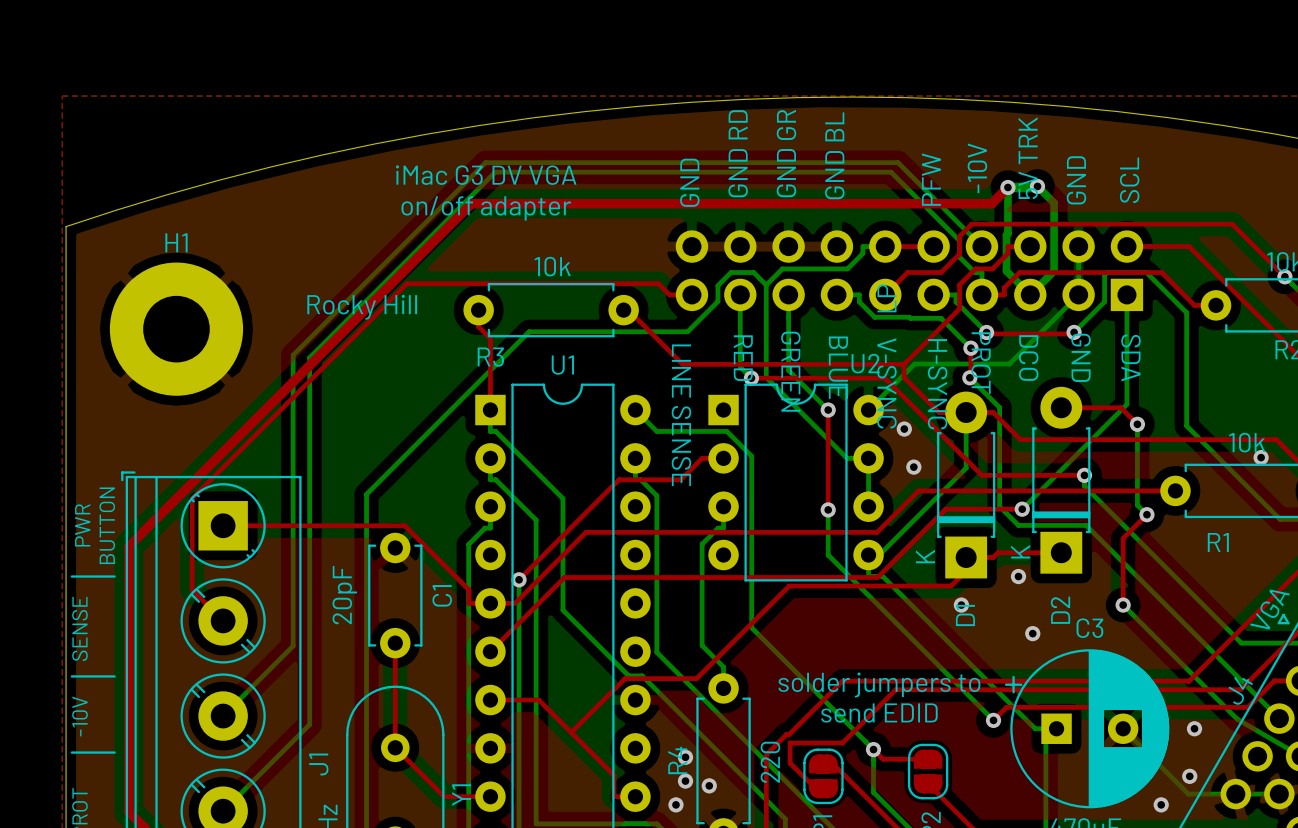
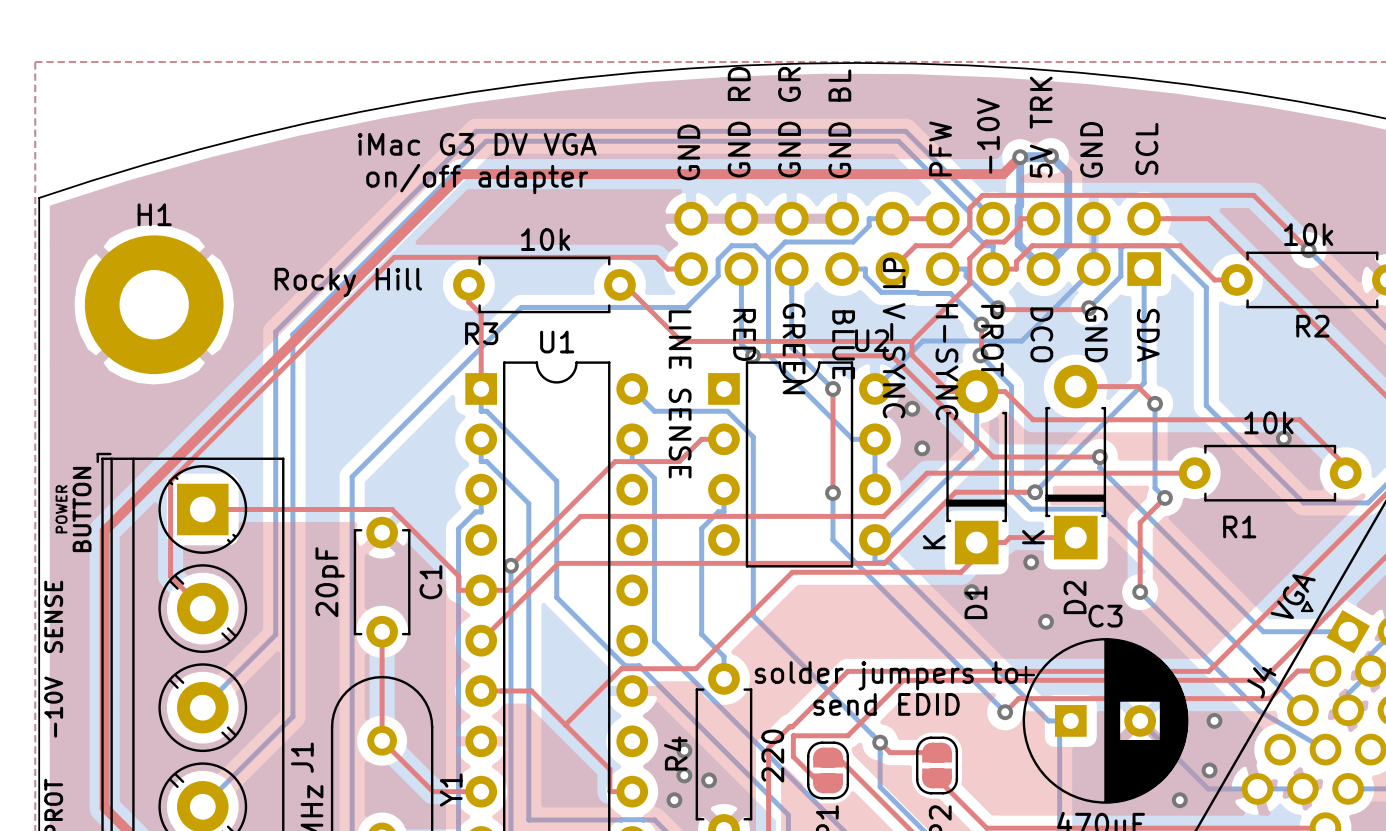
text: PWR (82, 525) -> POWER (61, 509)
line: (71, 576) (114, 576) -> none
line: (71, 676) (114, 676) -> none
line: (71, 752) (114, 752) -> none

